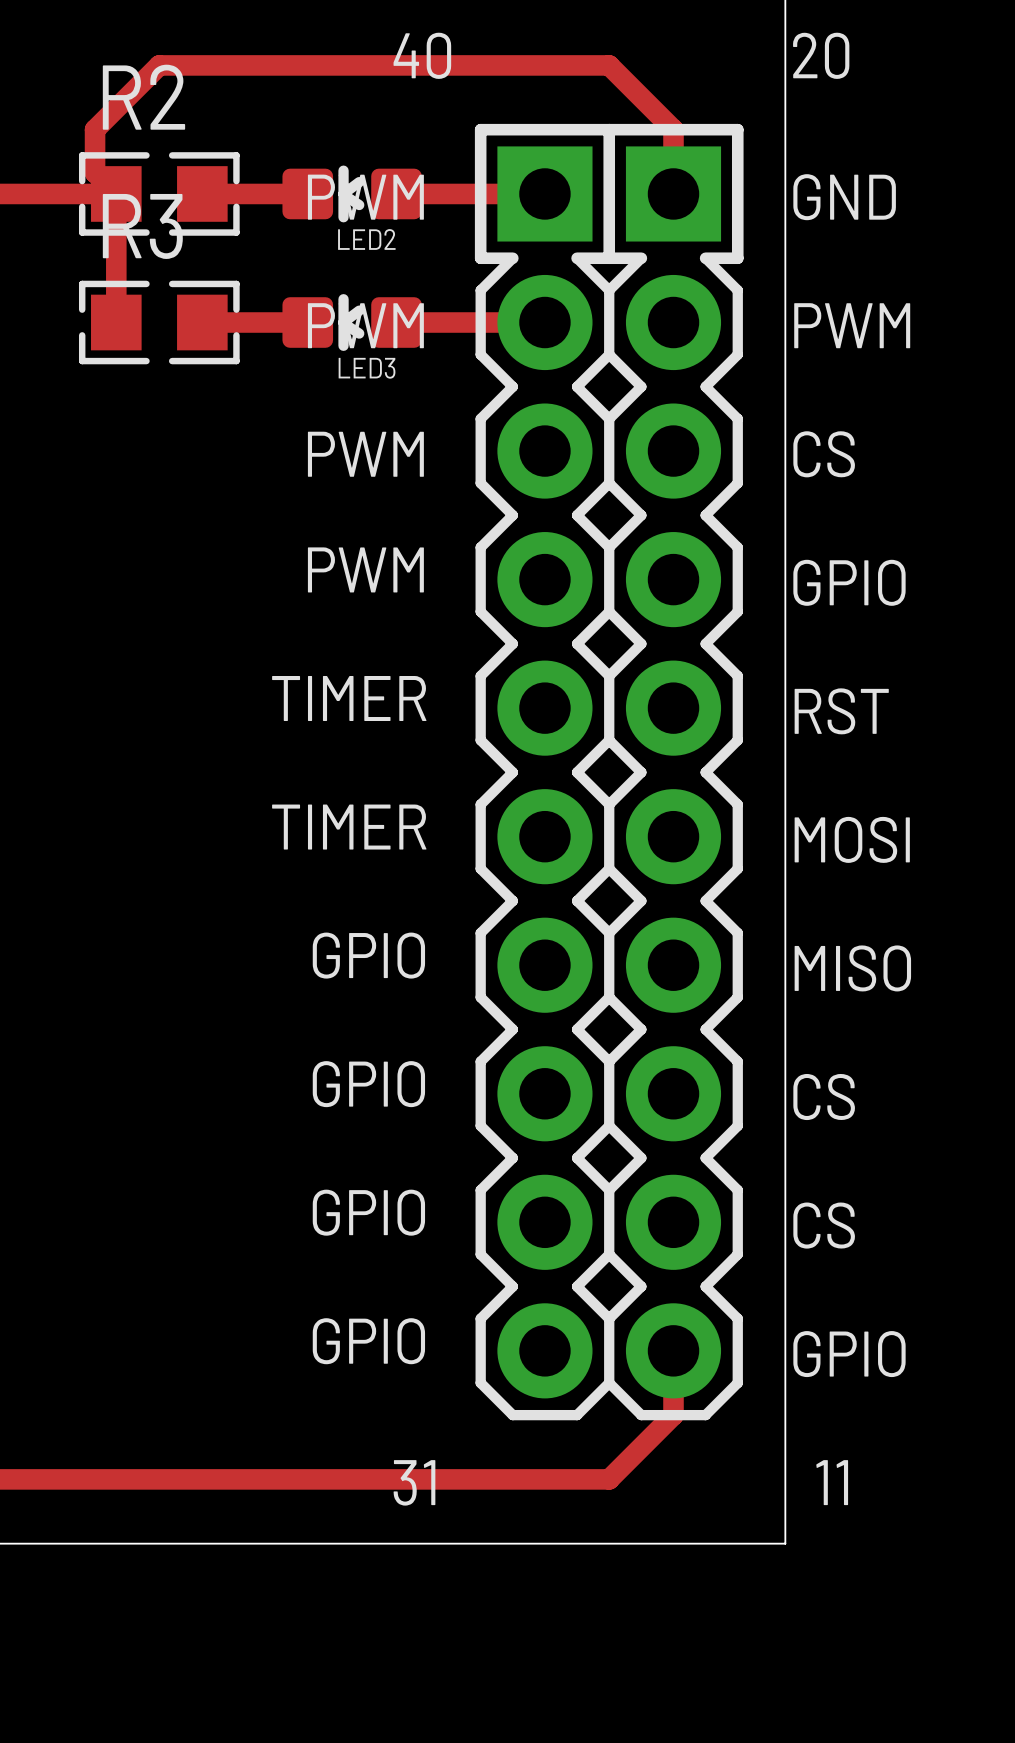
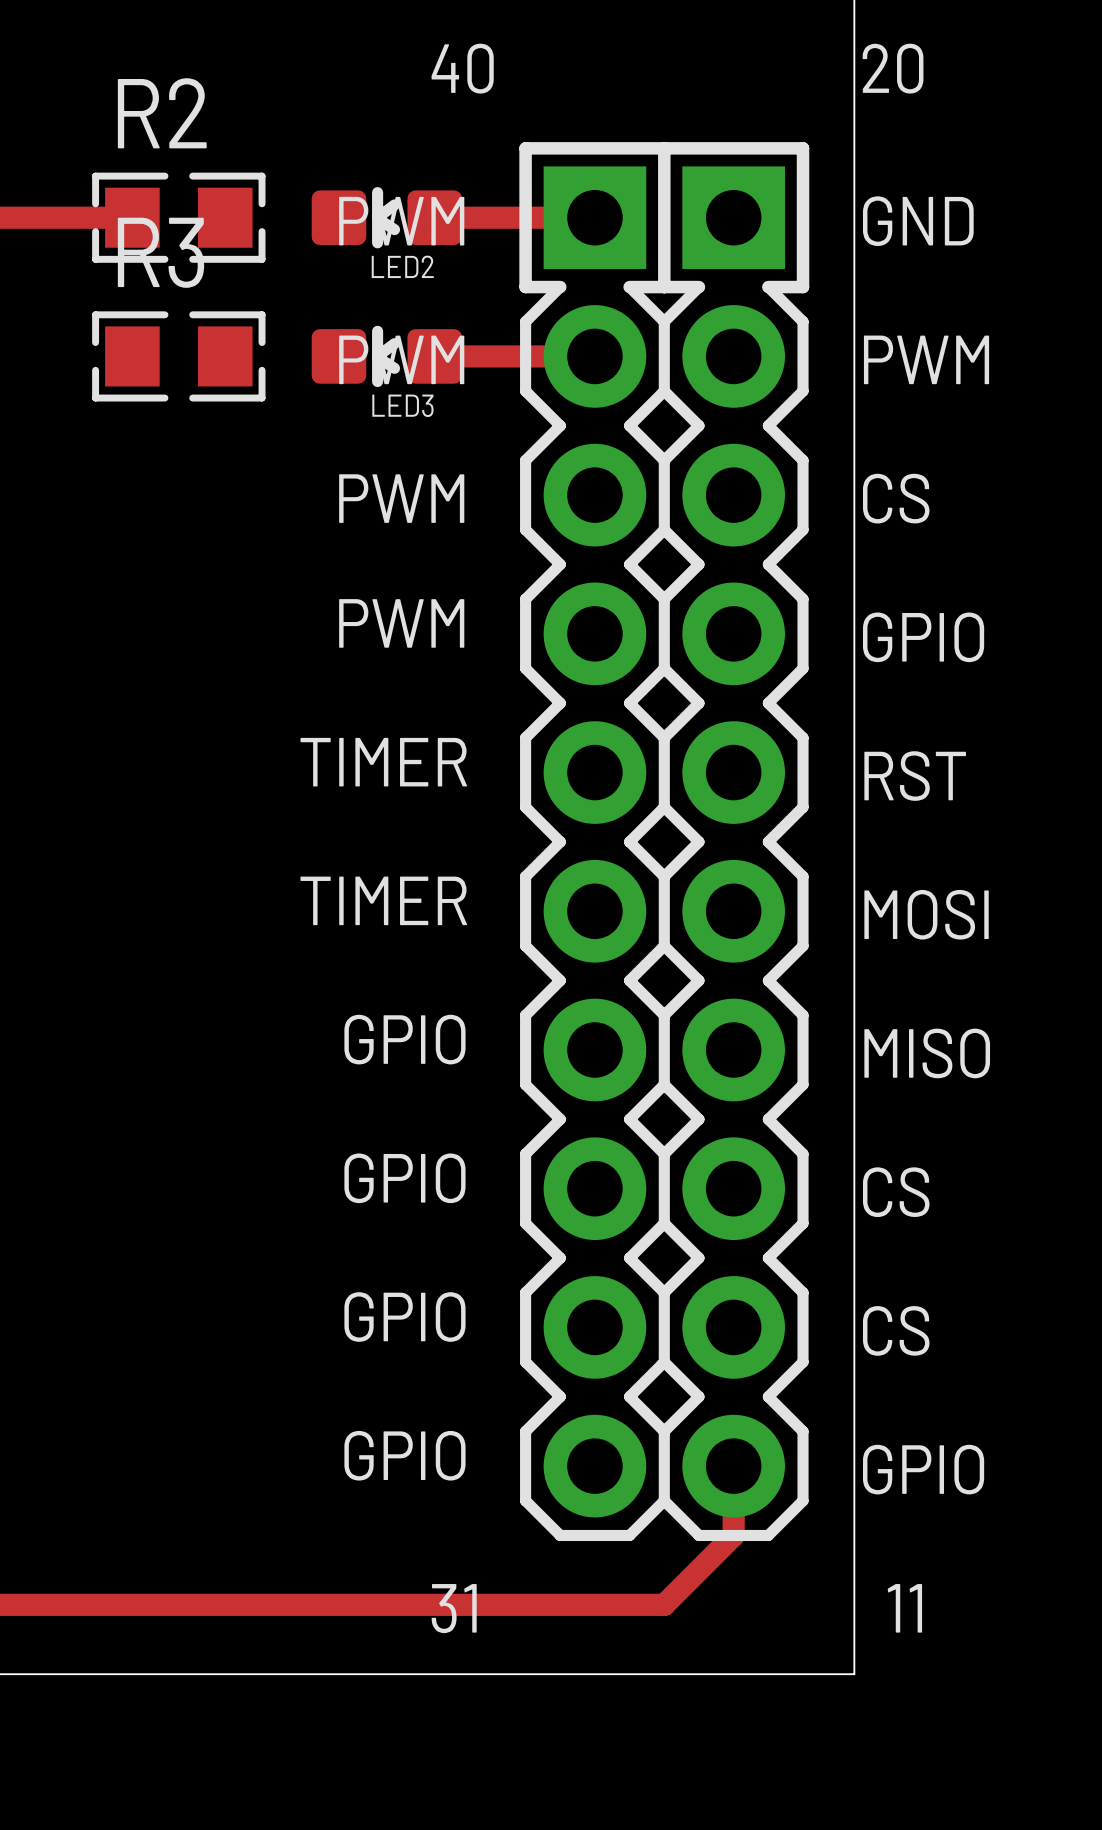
track: (202, 193) (307, 193) -> none
track: (673, 193) (673, 129) (609, 65) (159, 65) (95, 129) (95, 172) (116, 193) (116, 322) -> none
track: (202, 322) (307, 322) -> none

